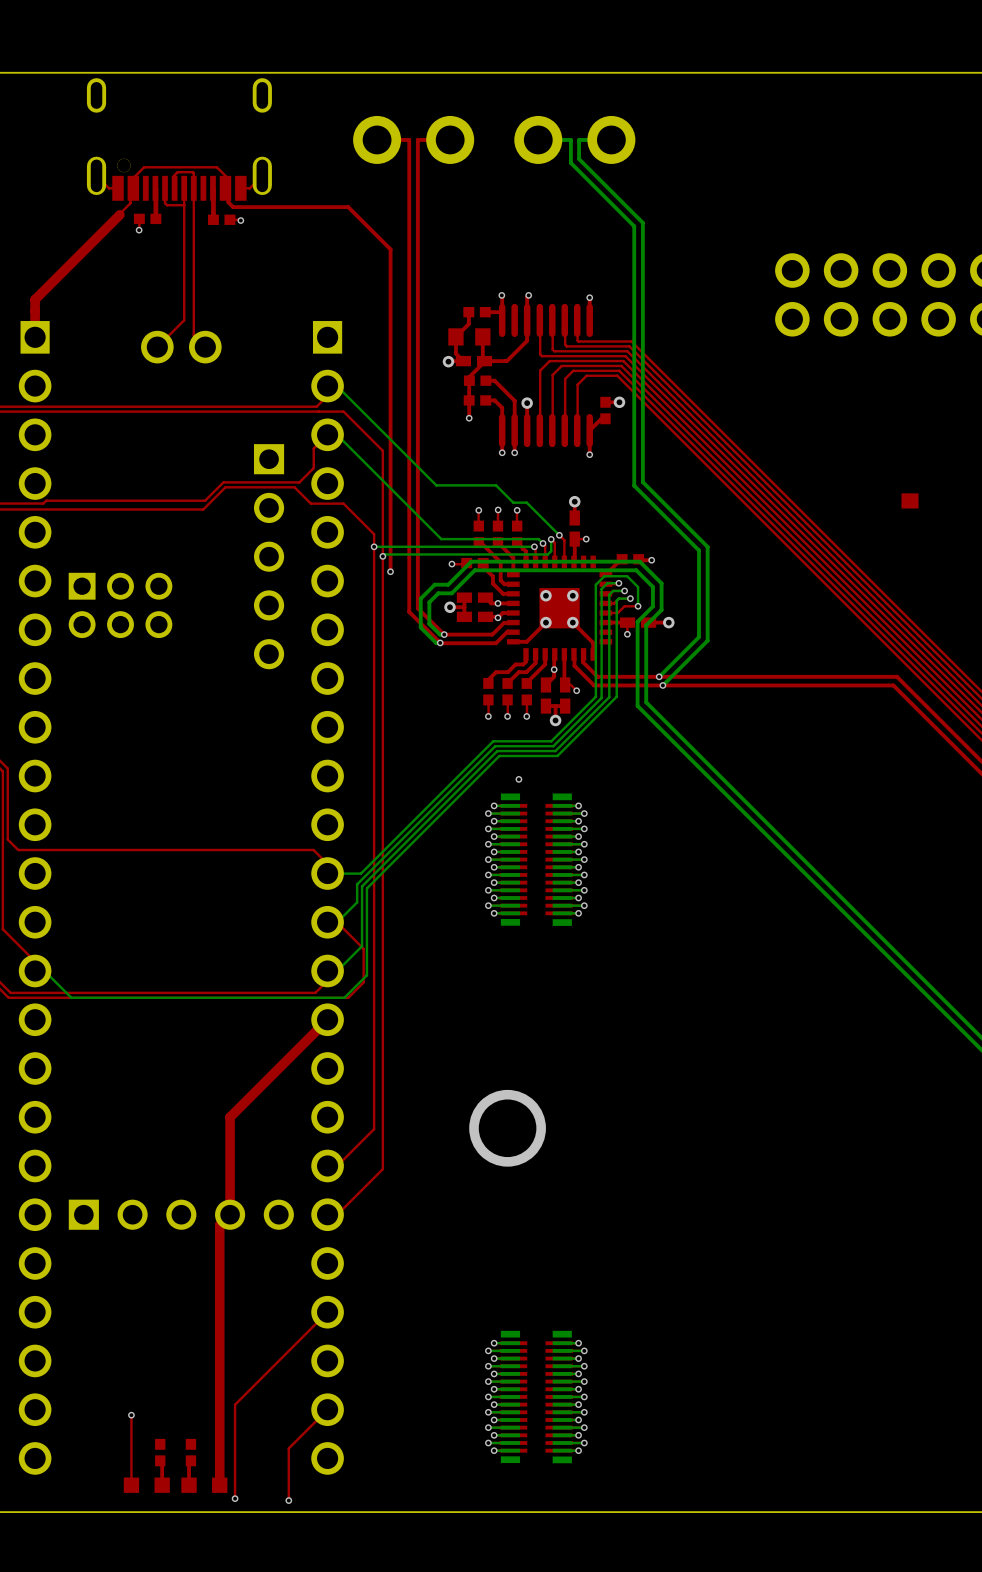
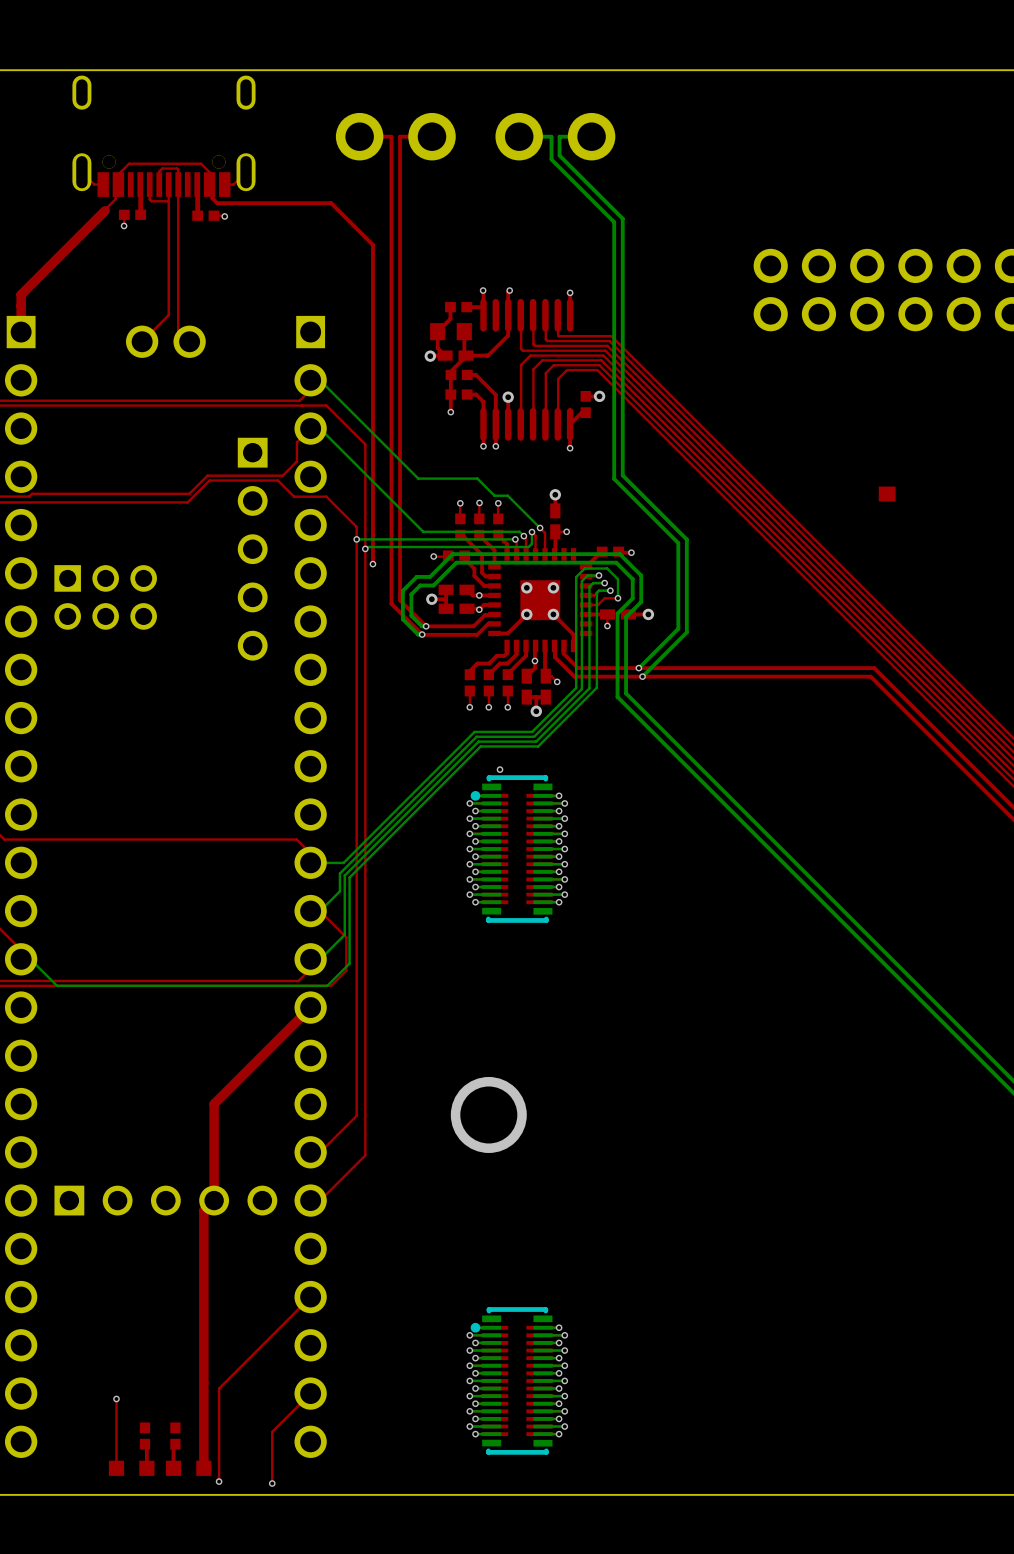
part footprint: [86, 78, 272, 201] -> [72, 75, 256, 197]
part footprint: [500, 793, 572, 926] -> [470, 775, 553, 923]
part footprint: [500, 1330, 572, 1464] -> [470, 1307, 553, 1455]

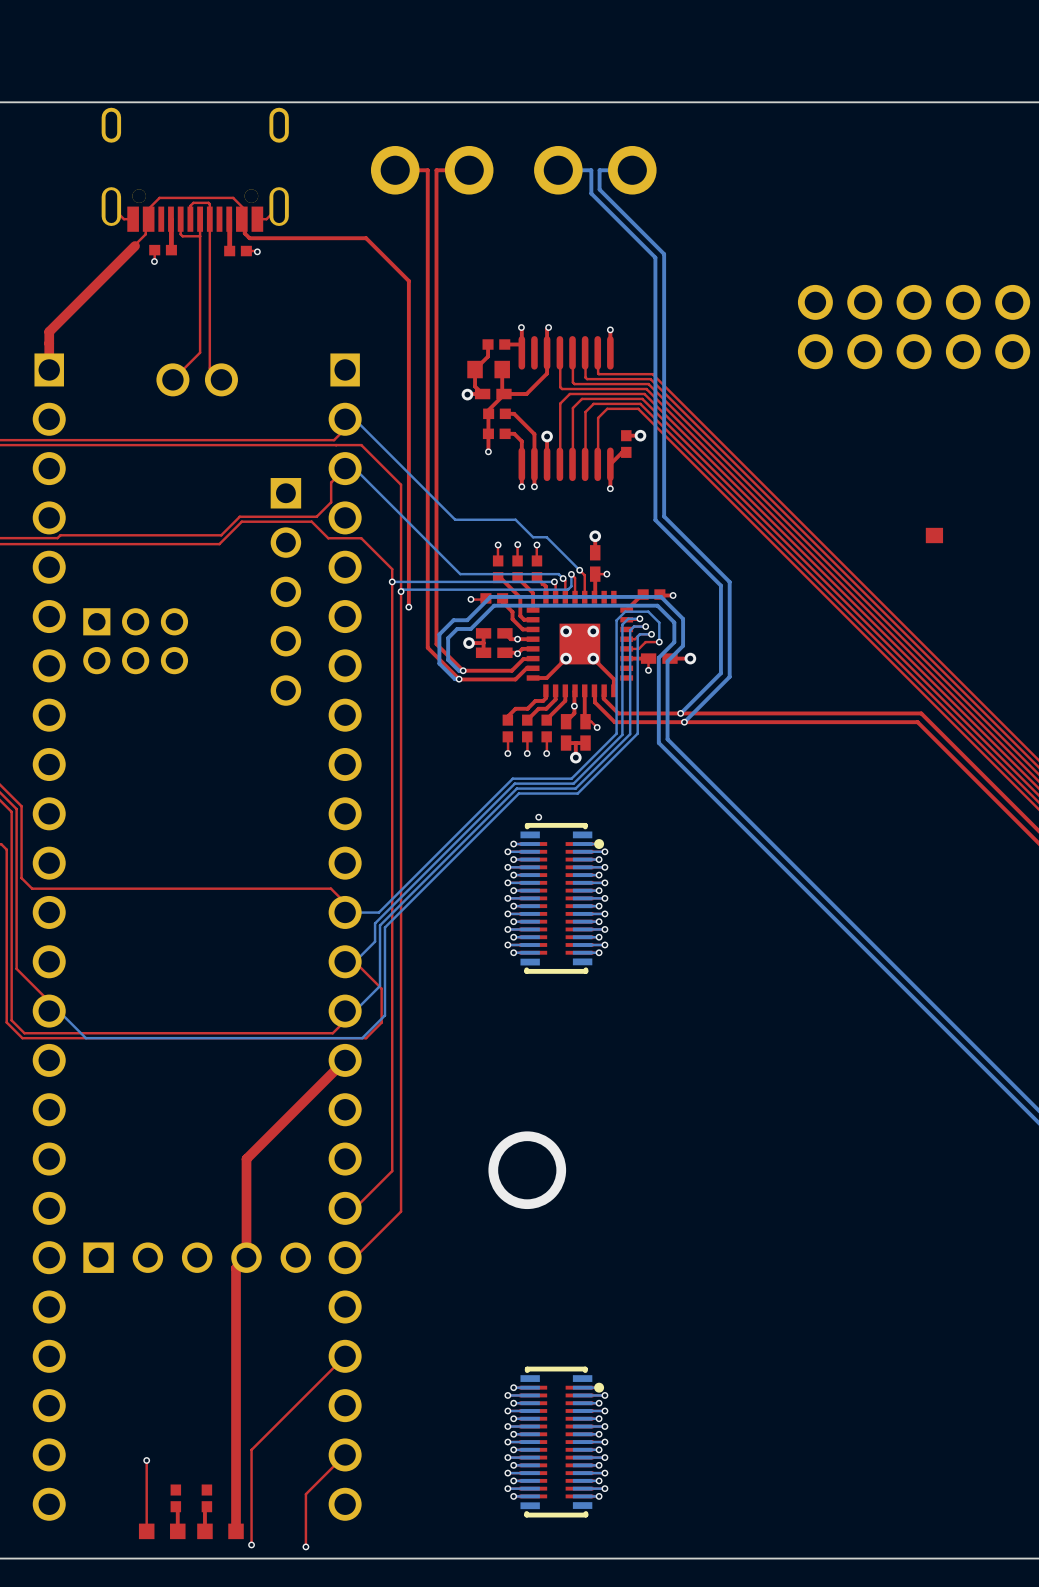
part footprint: [470, 775, 553, 923] -> [520, 822, 605, 974]
part footprint: [470, 1307, 553, 1455] -> [520, 1366, 605, 1518]

